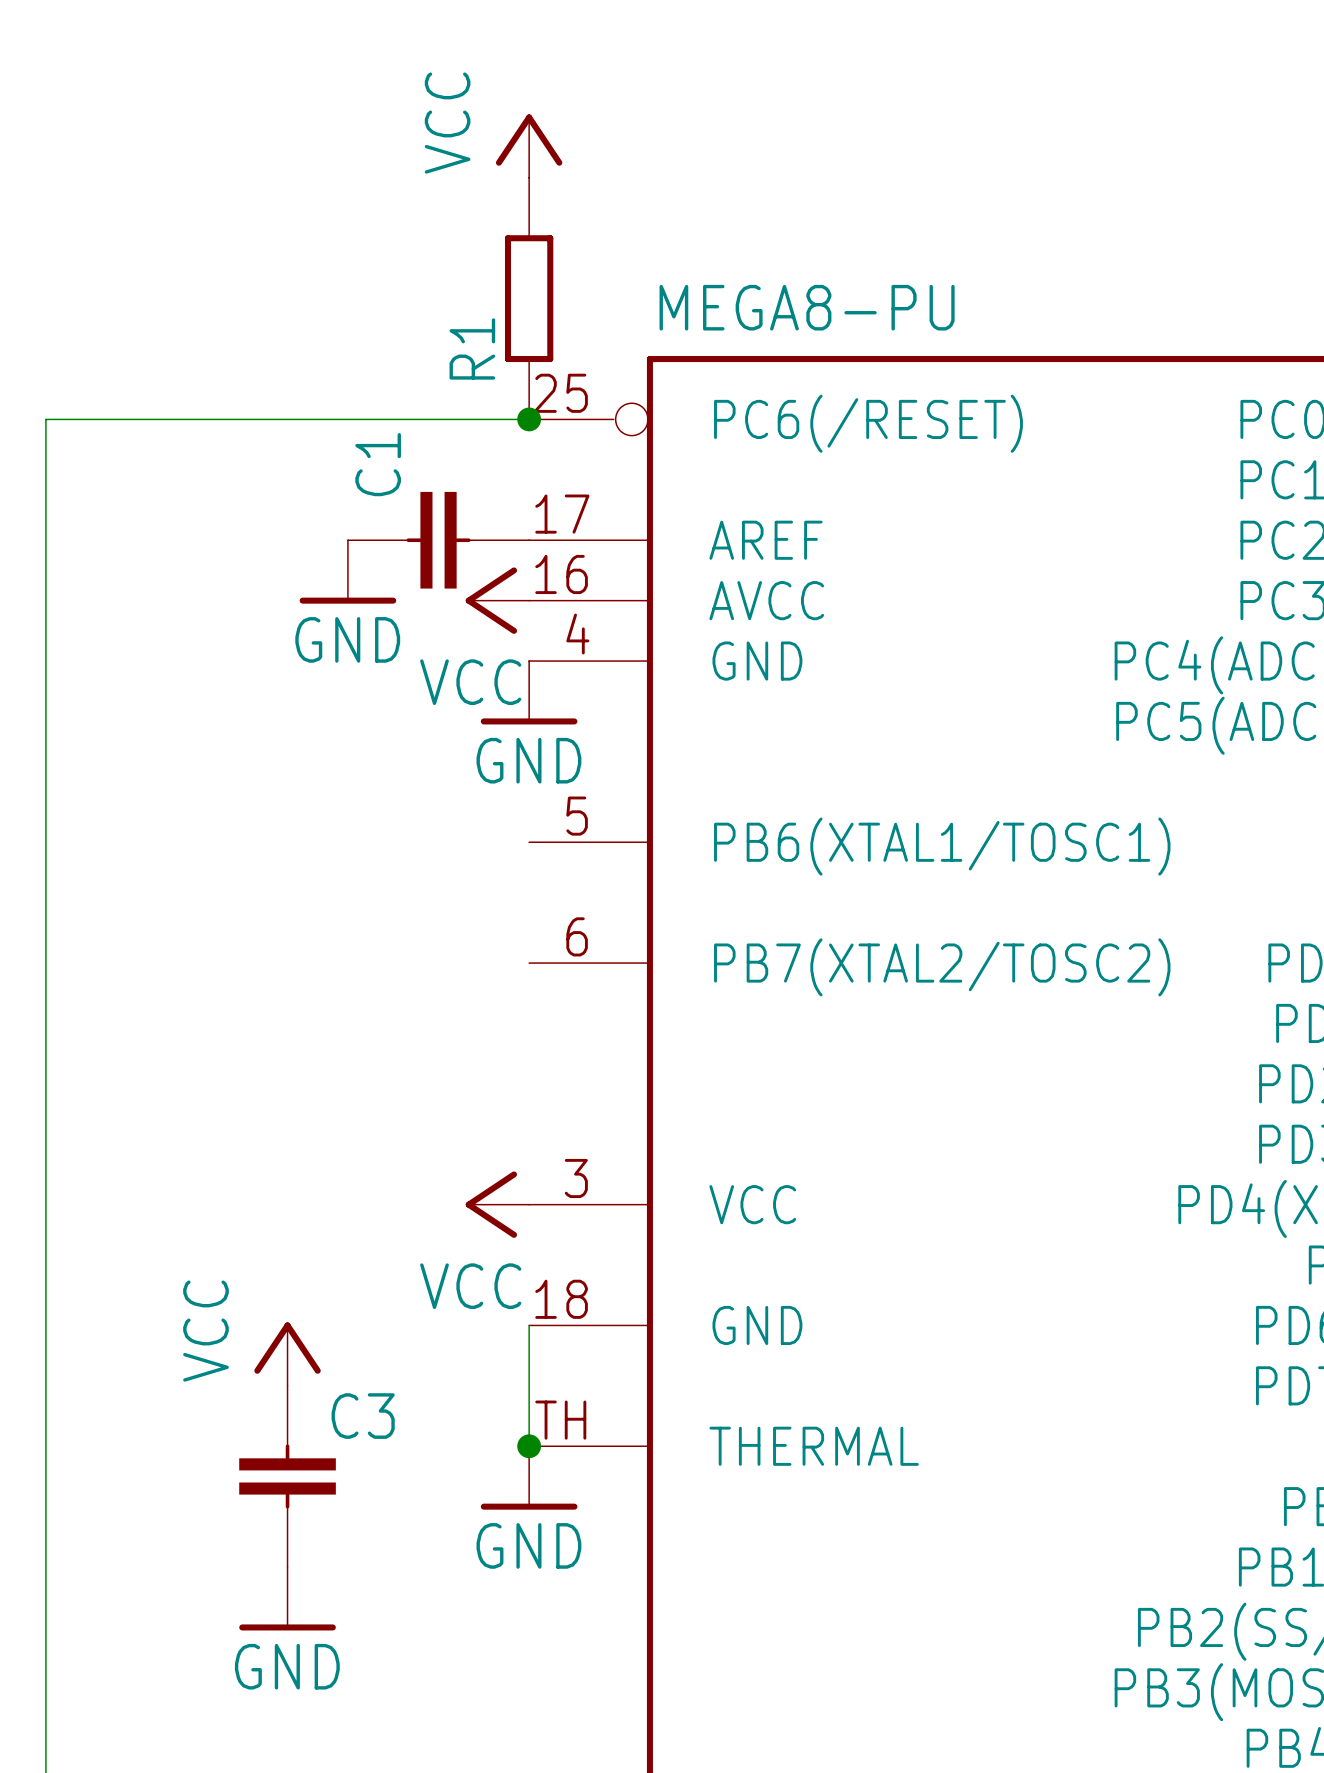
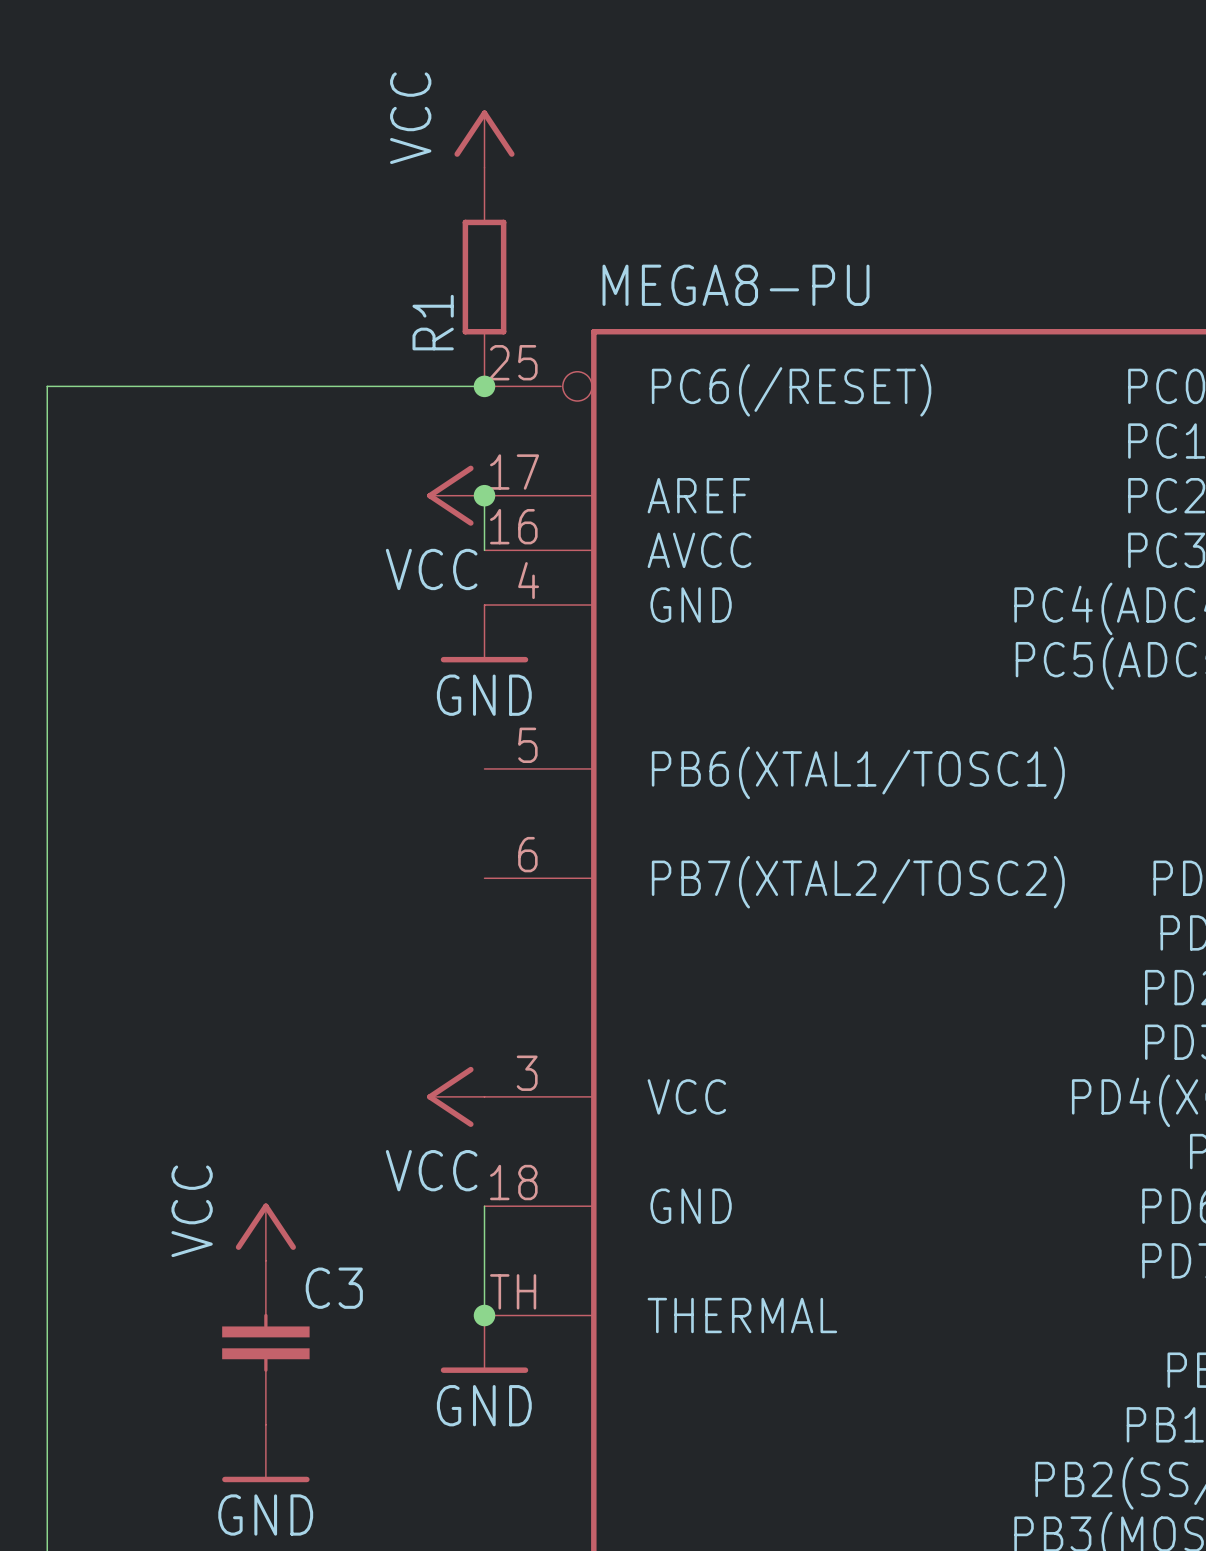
C1: (438, 540) -> none
wire: none -> (484, 495) (484, 550)
junction: none -> (484, 495)
power symbol: GND (347, 571) -> none
power symbol position: VCC (497, 600) -> VCC (455, 495)

